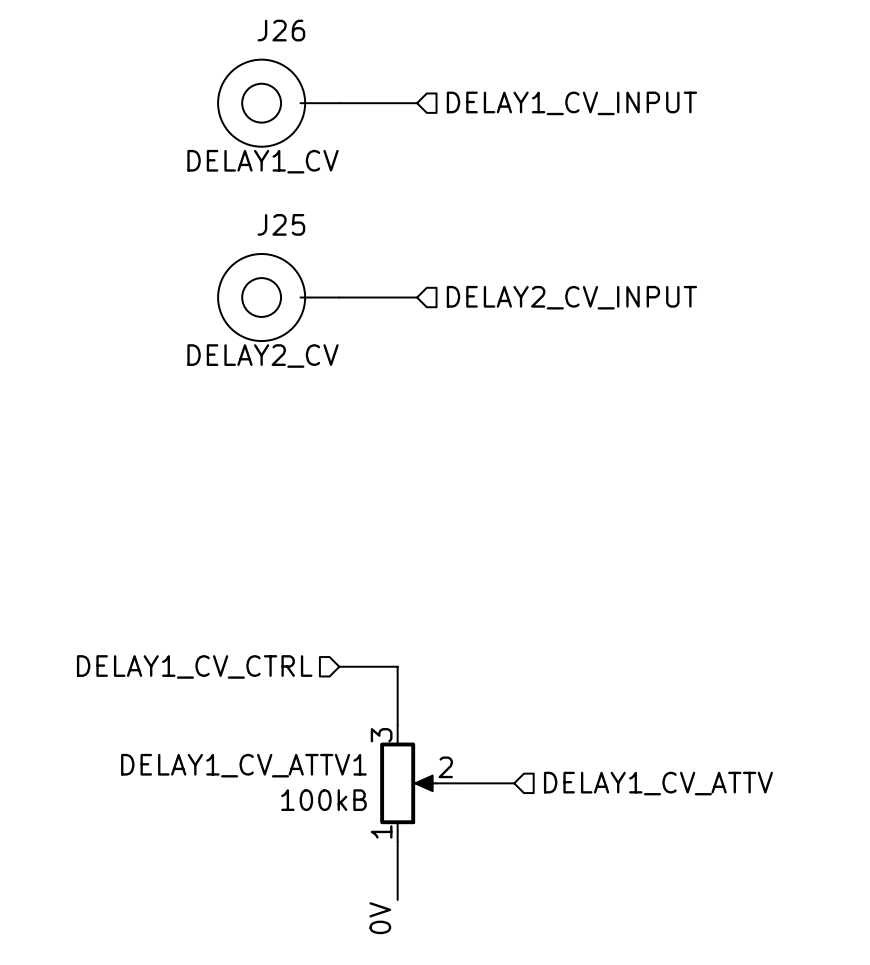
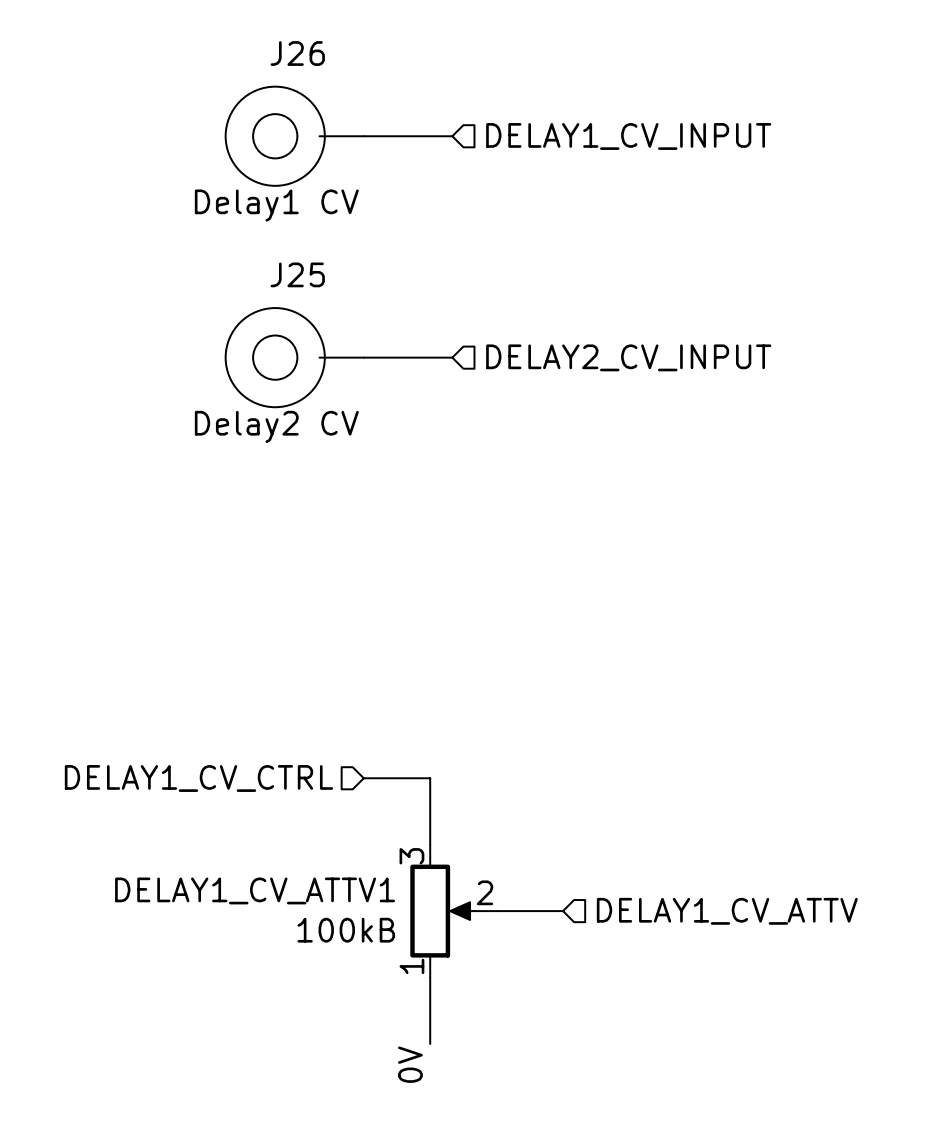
J26 value: DELAY1_CV (263, 161) -> none
J26 text: none -> Delay1 CV (276, 205)
J25 value: DELAY2_CV (263, 356) -> none
J25 text: none -> Delay2 CV (276, 426)

